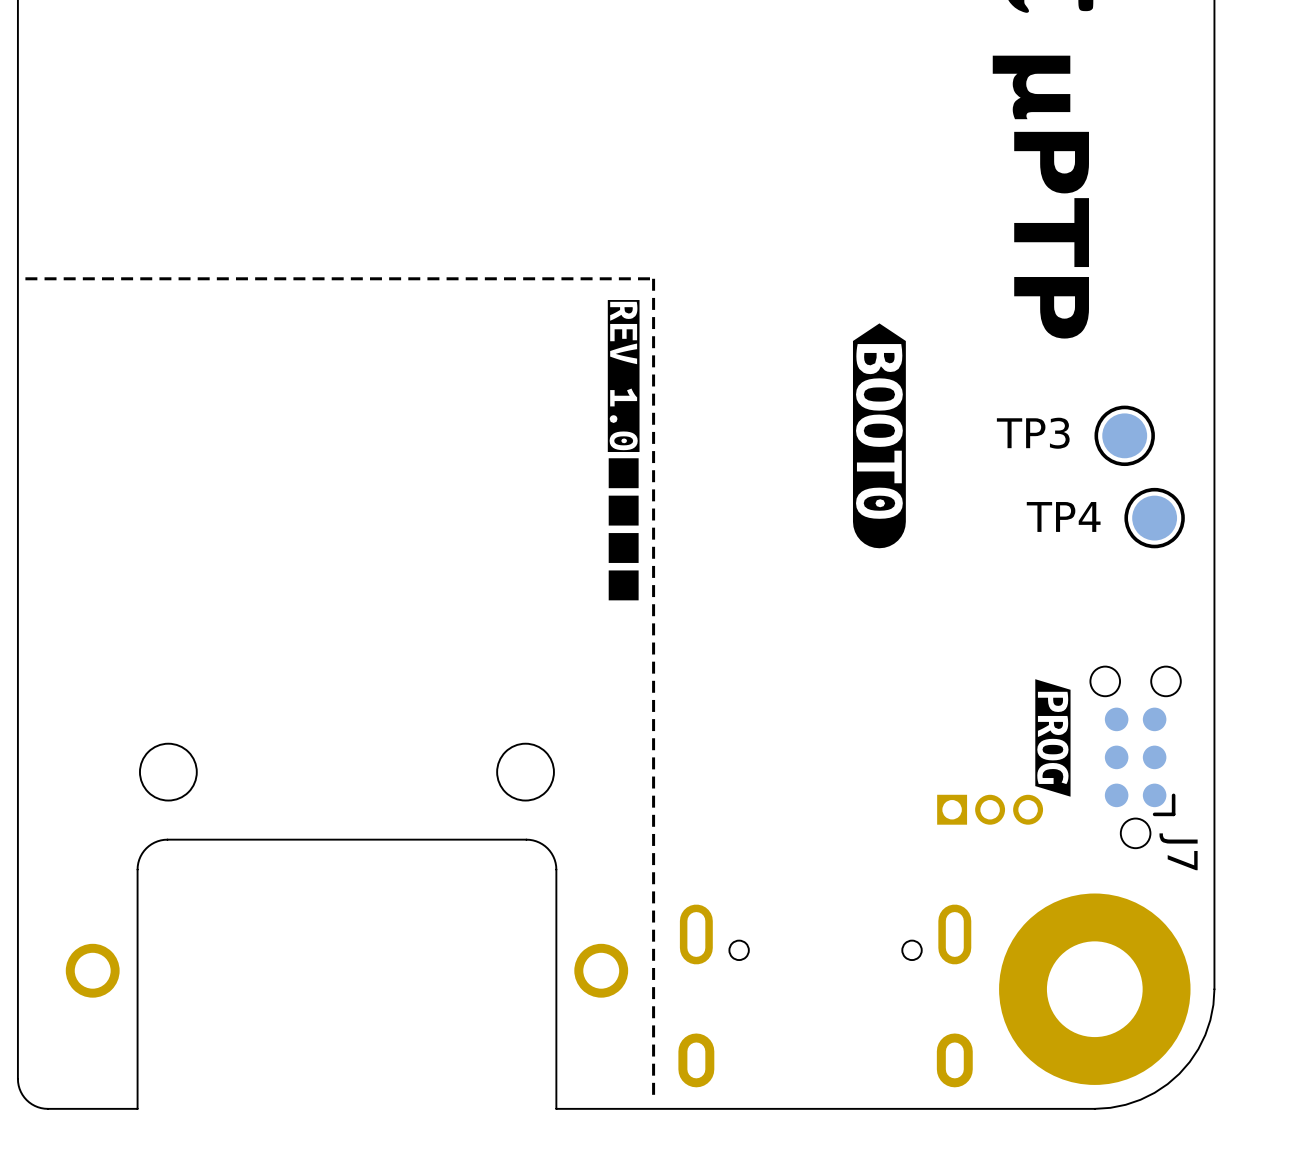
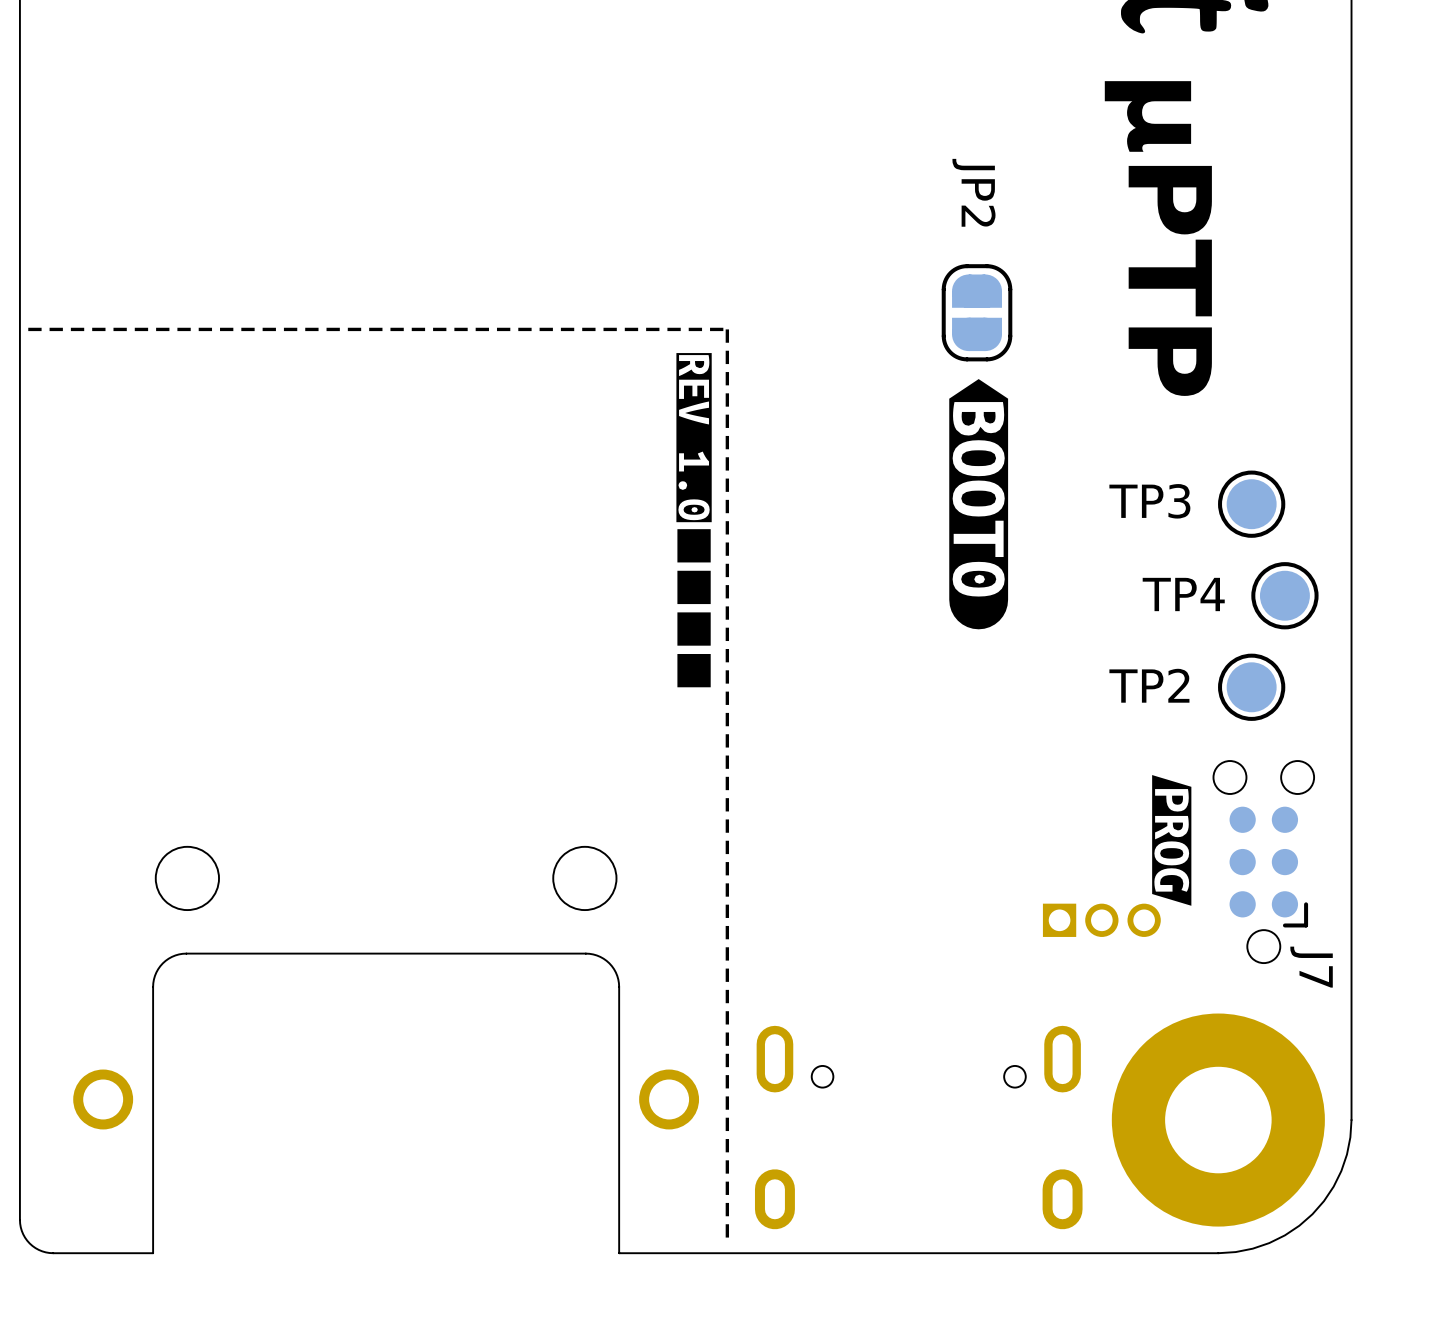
JP2: none -> (977, 312)
TP2: none -> (1251, 687)

